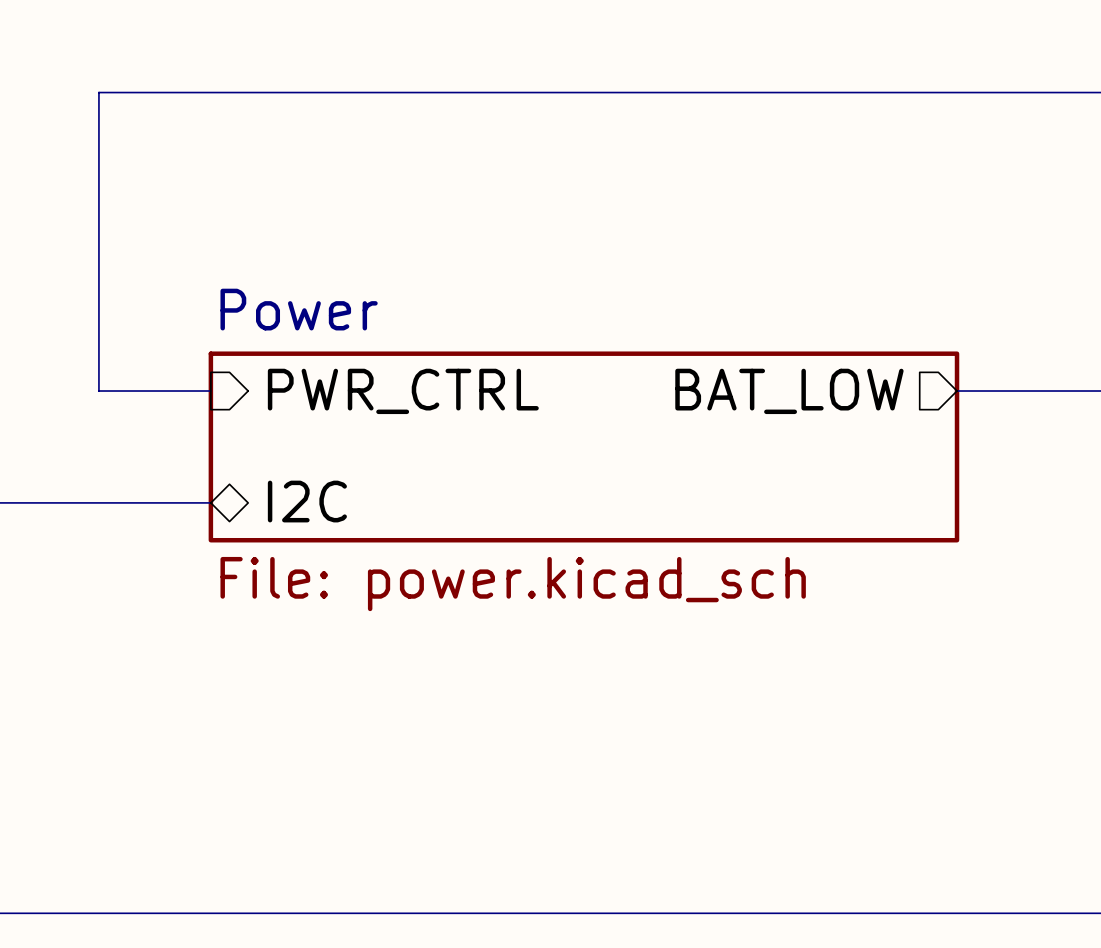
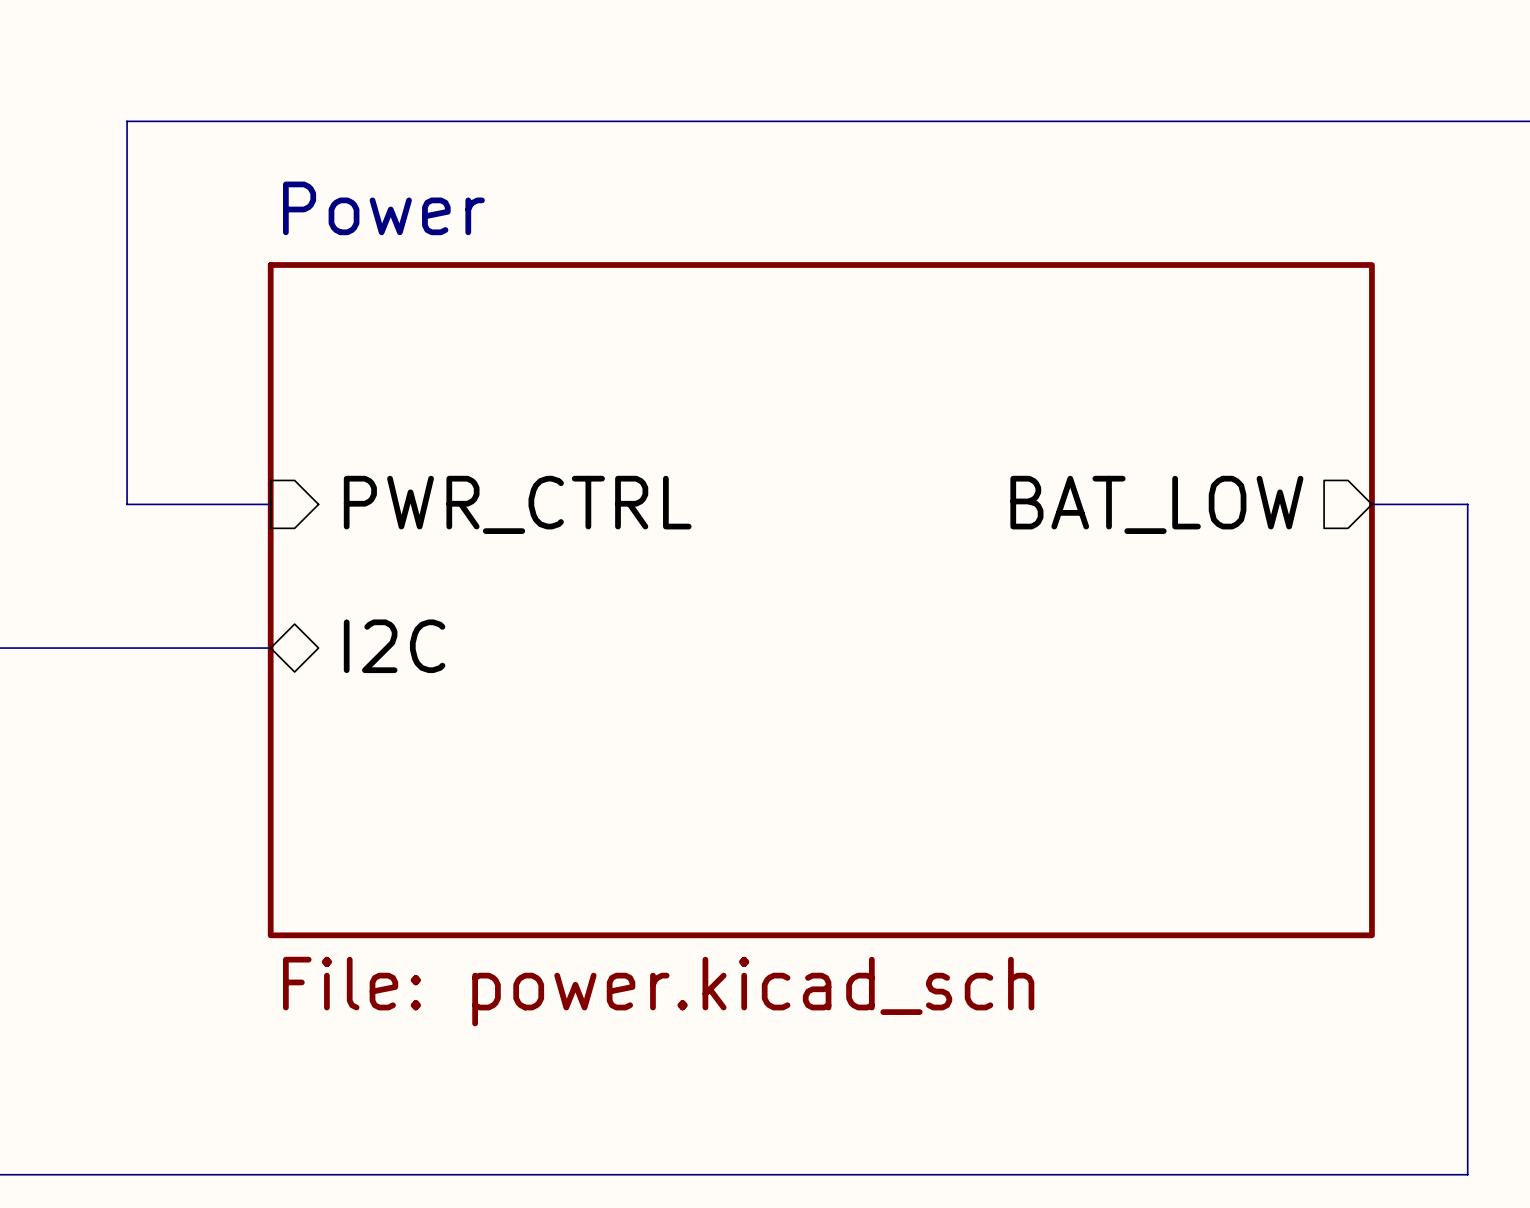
sheet pin position: BAT_LOW (789, 391) -> BAT_LOW (1156, 504)
wire: (957, 391) (1068, 391) -> none
sheet Power: File: power.kicad_sch (583, 446) -> none
sheet Power: none -> File: power.kicad_sch (821, 600)

